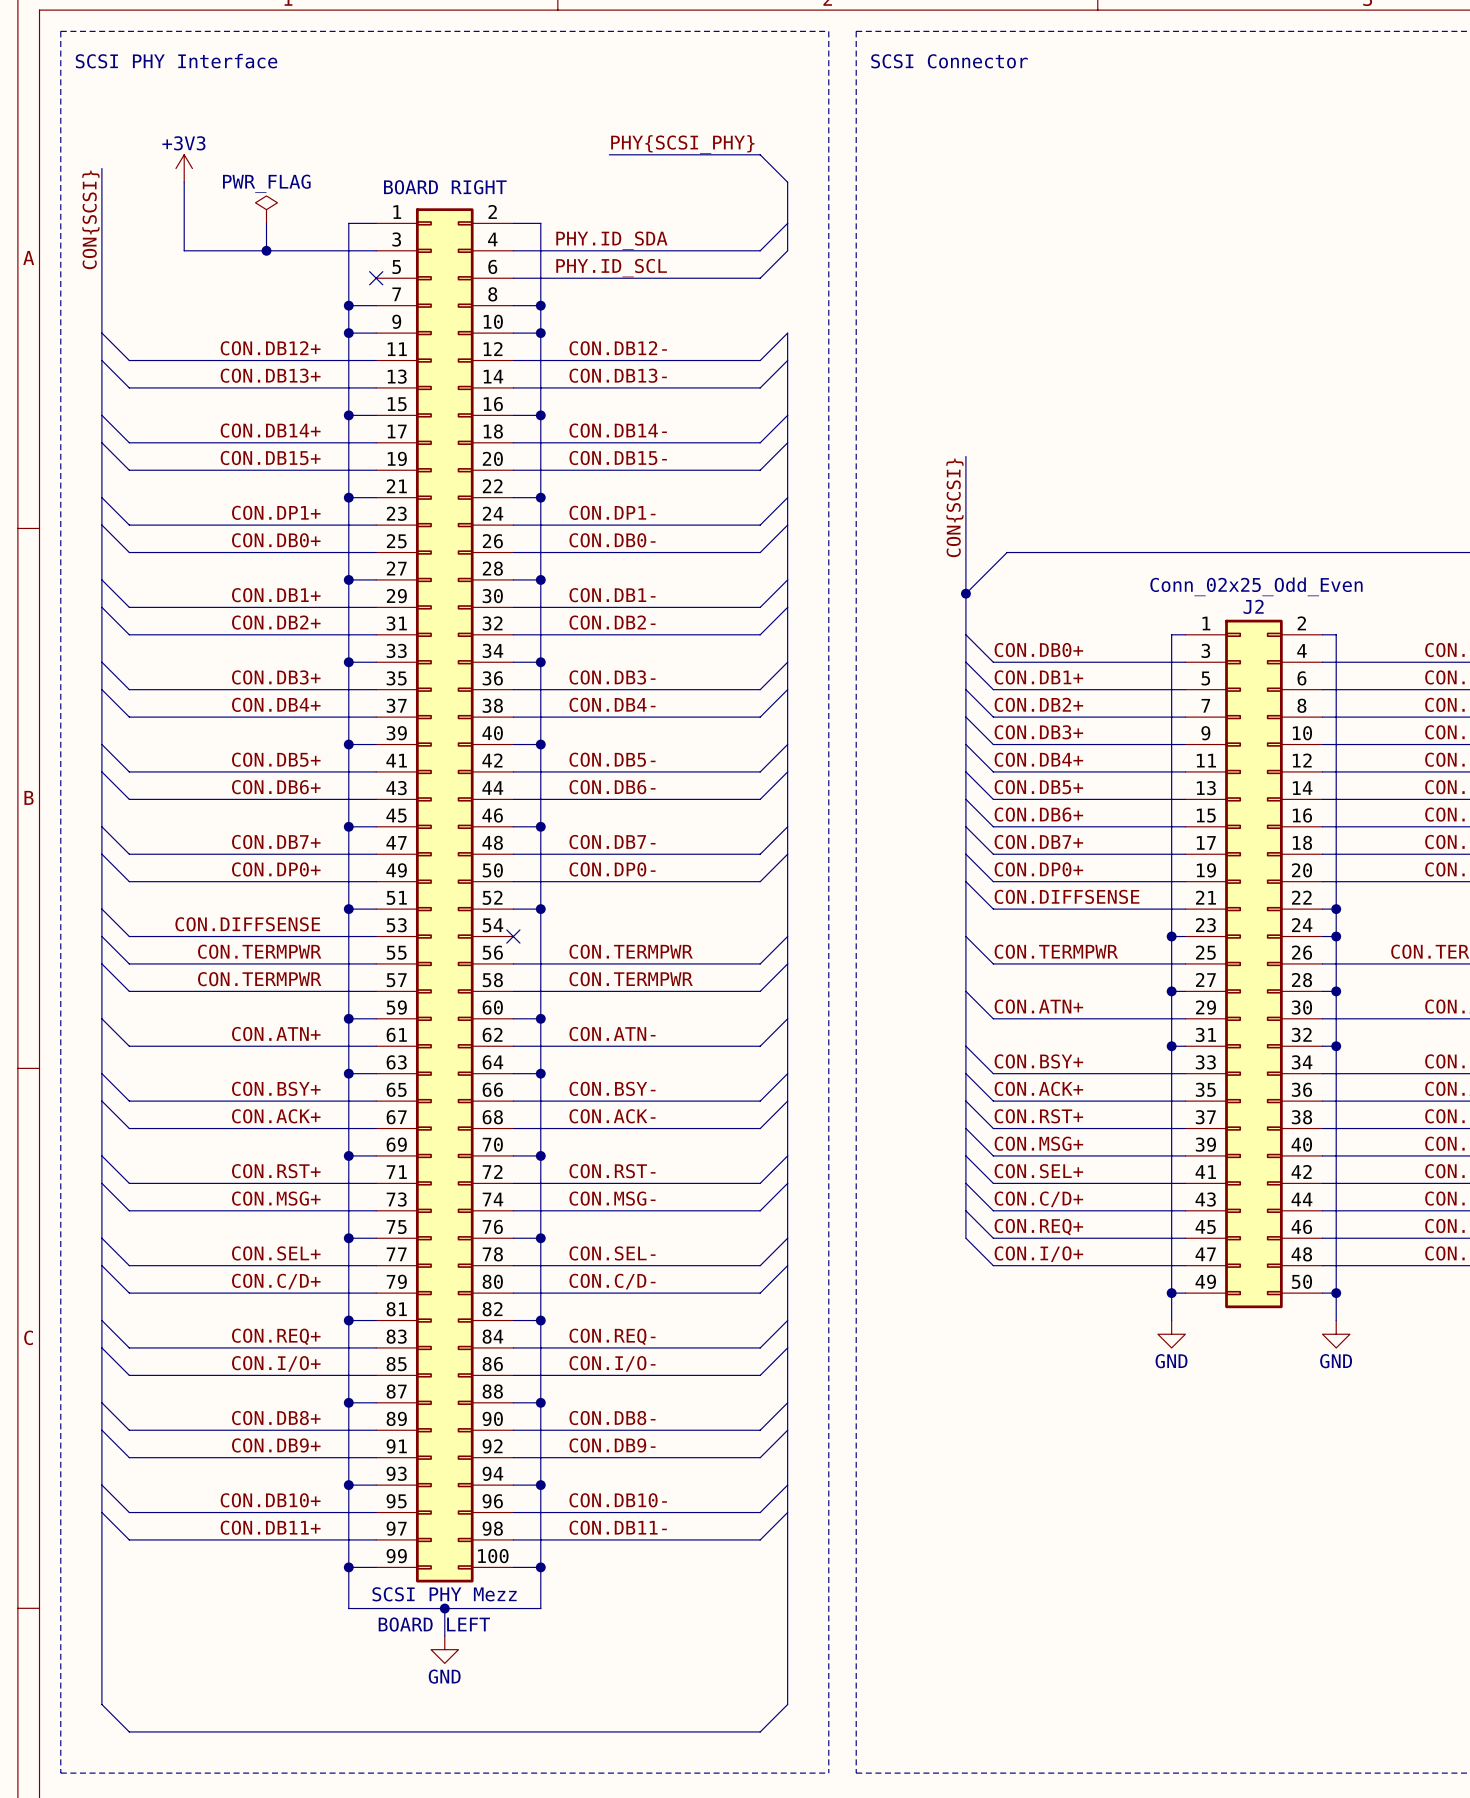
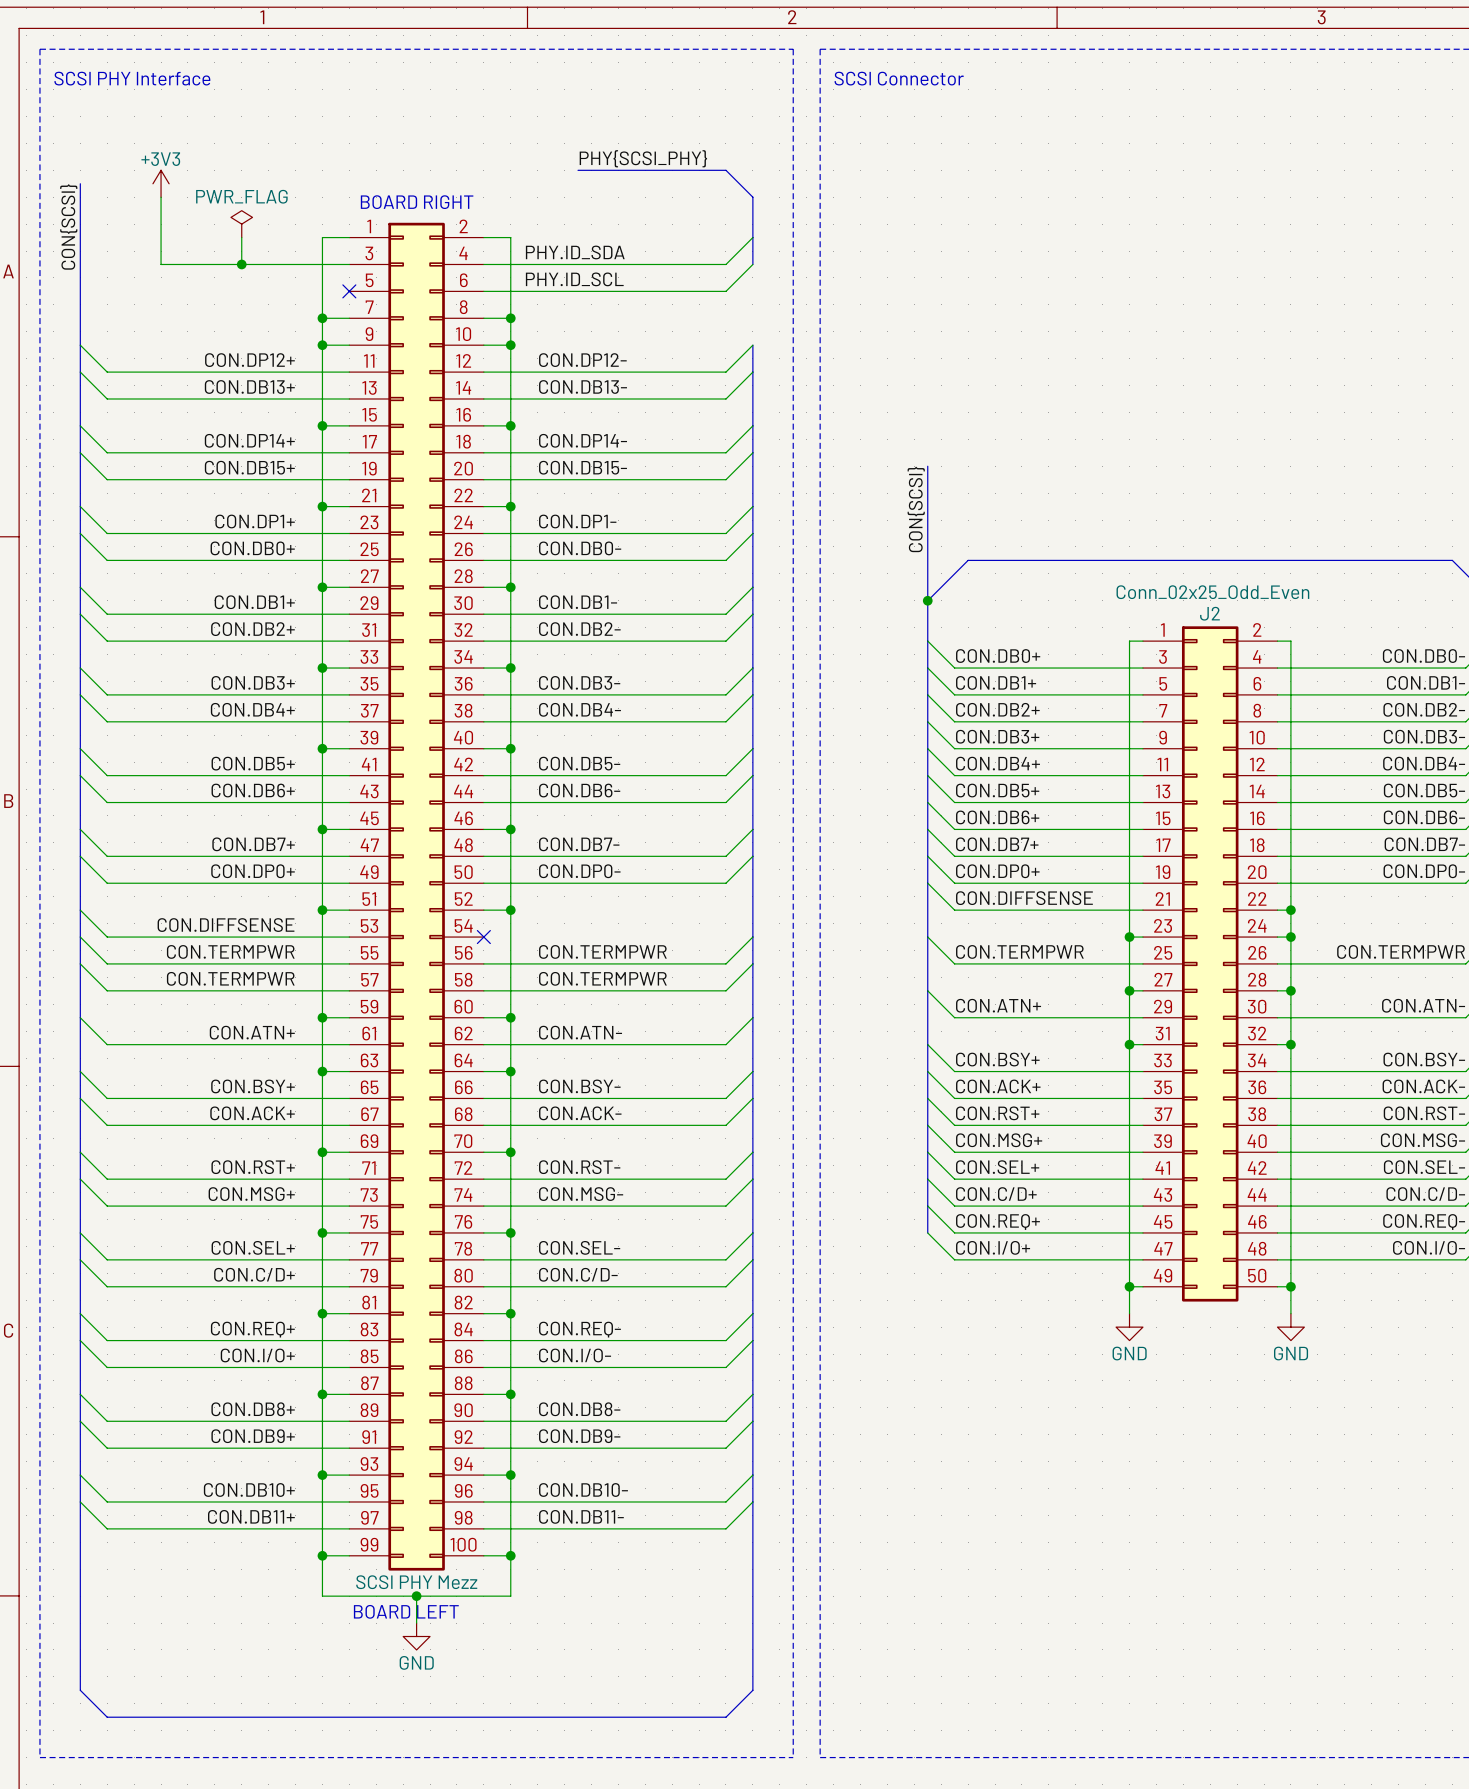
label: CON.DB12+ (270, 348) -> CON.DP12+ (249, 360)
label: CON.DB12- (618, 348) -> CON.DP12- (582, 360)
label: CON.DB14+ (270, 430) -> CON.DP14+ (249, 440)
label: CON.DB14- (618, 430) -> CON.DP14- (583, 440)

